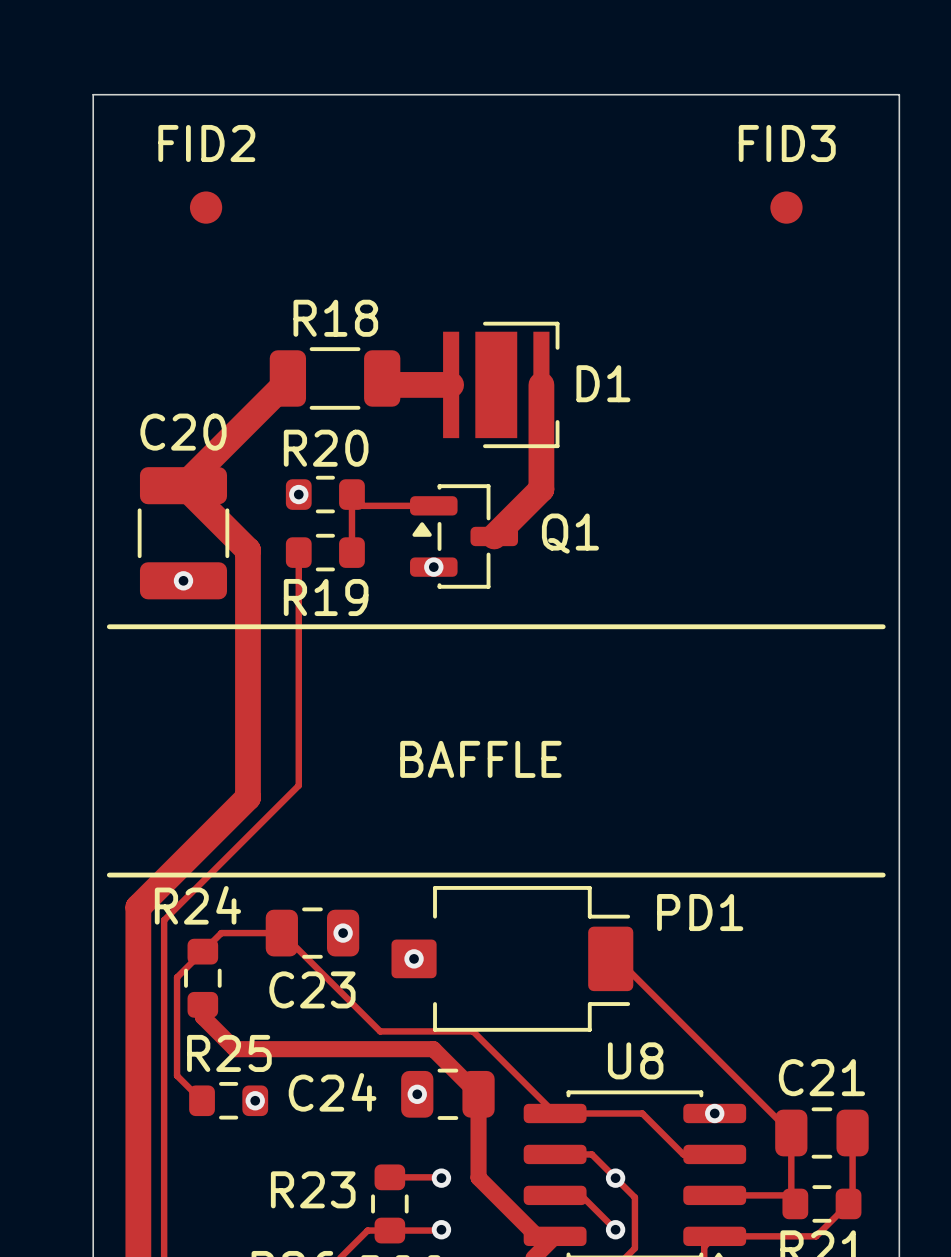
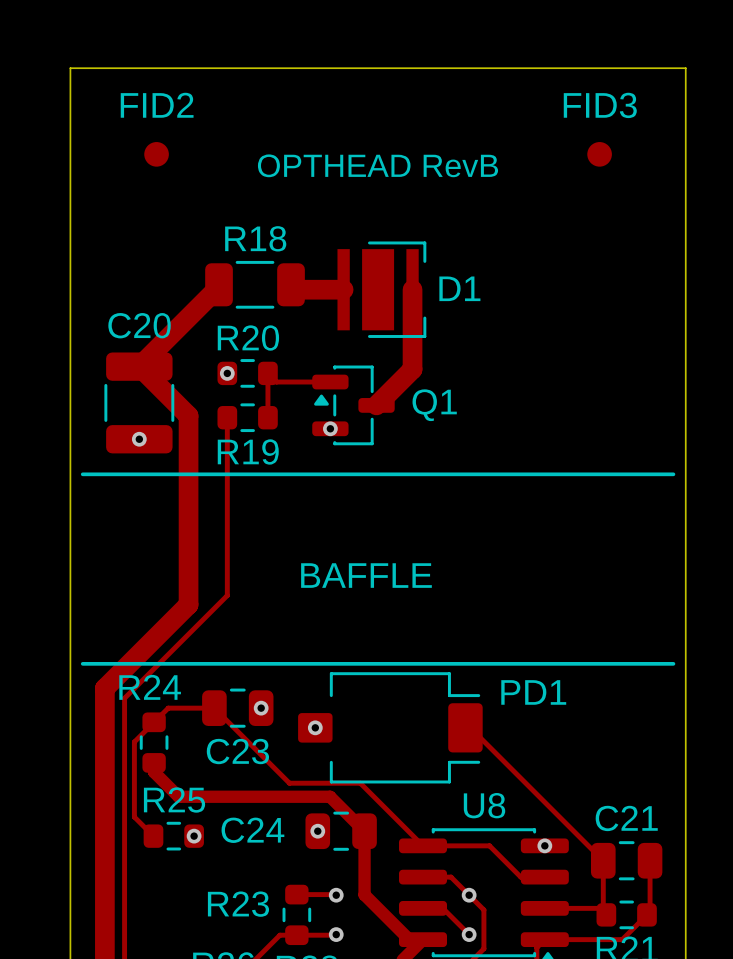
text: none -> OPTHEAD RevB (377, 165)

